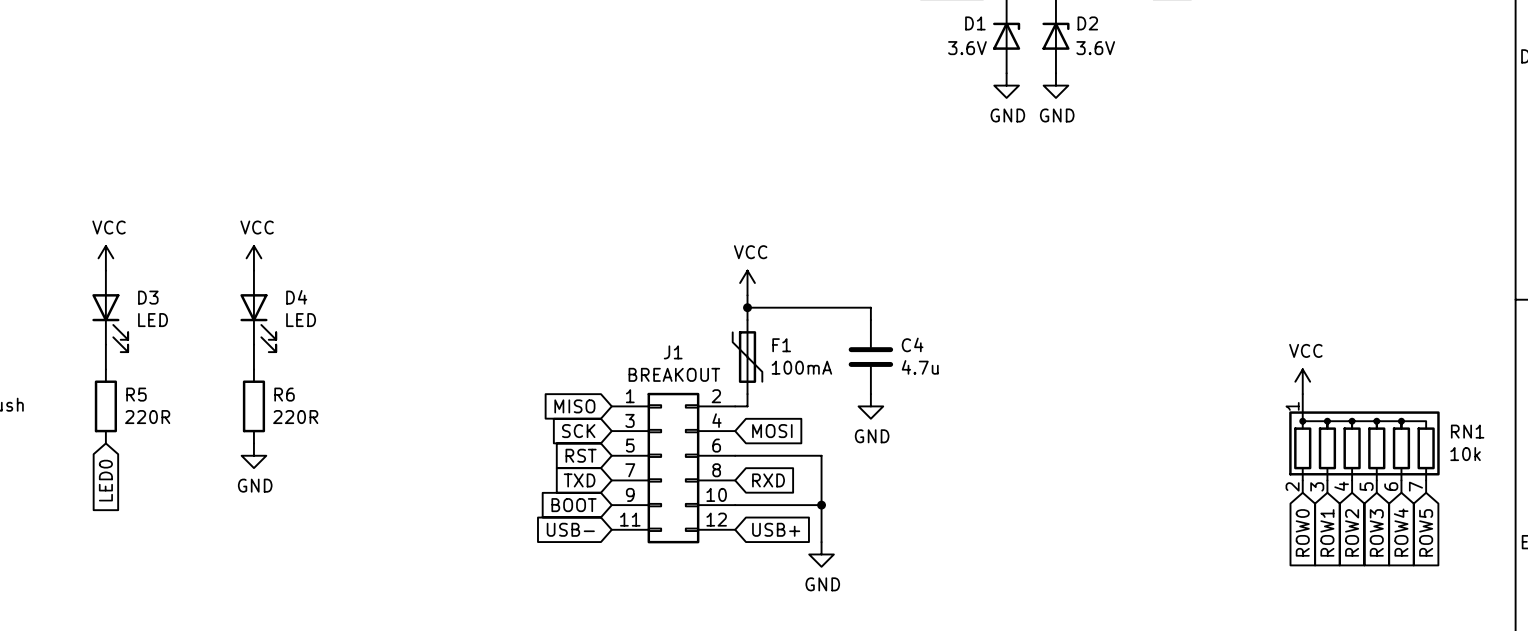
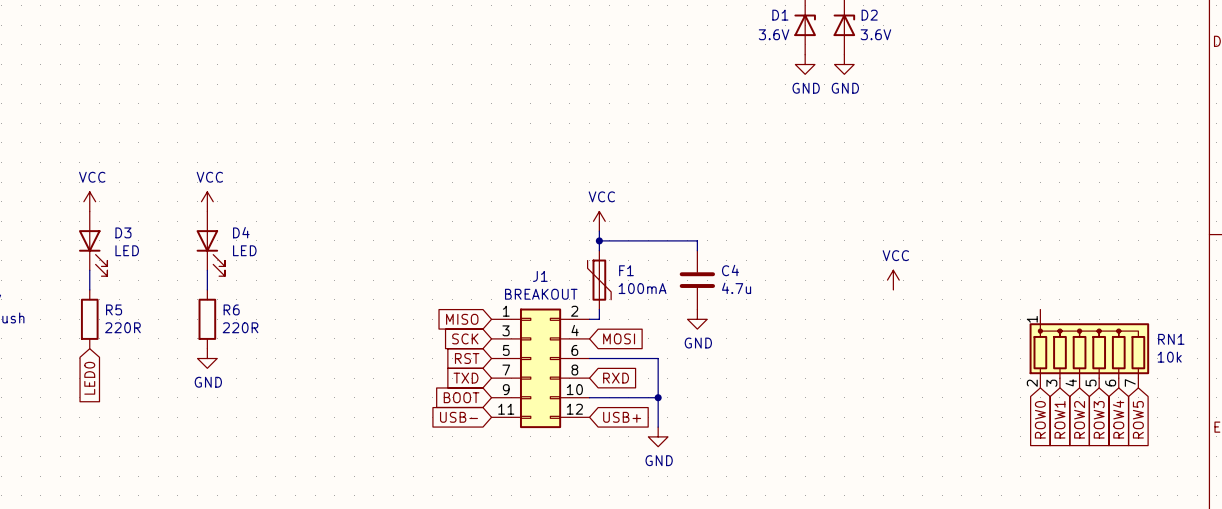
power symbol position: VCC (1302, 381) -> VCC (893, 280)

